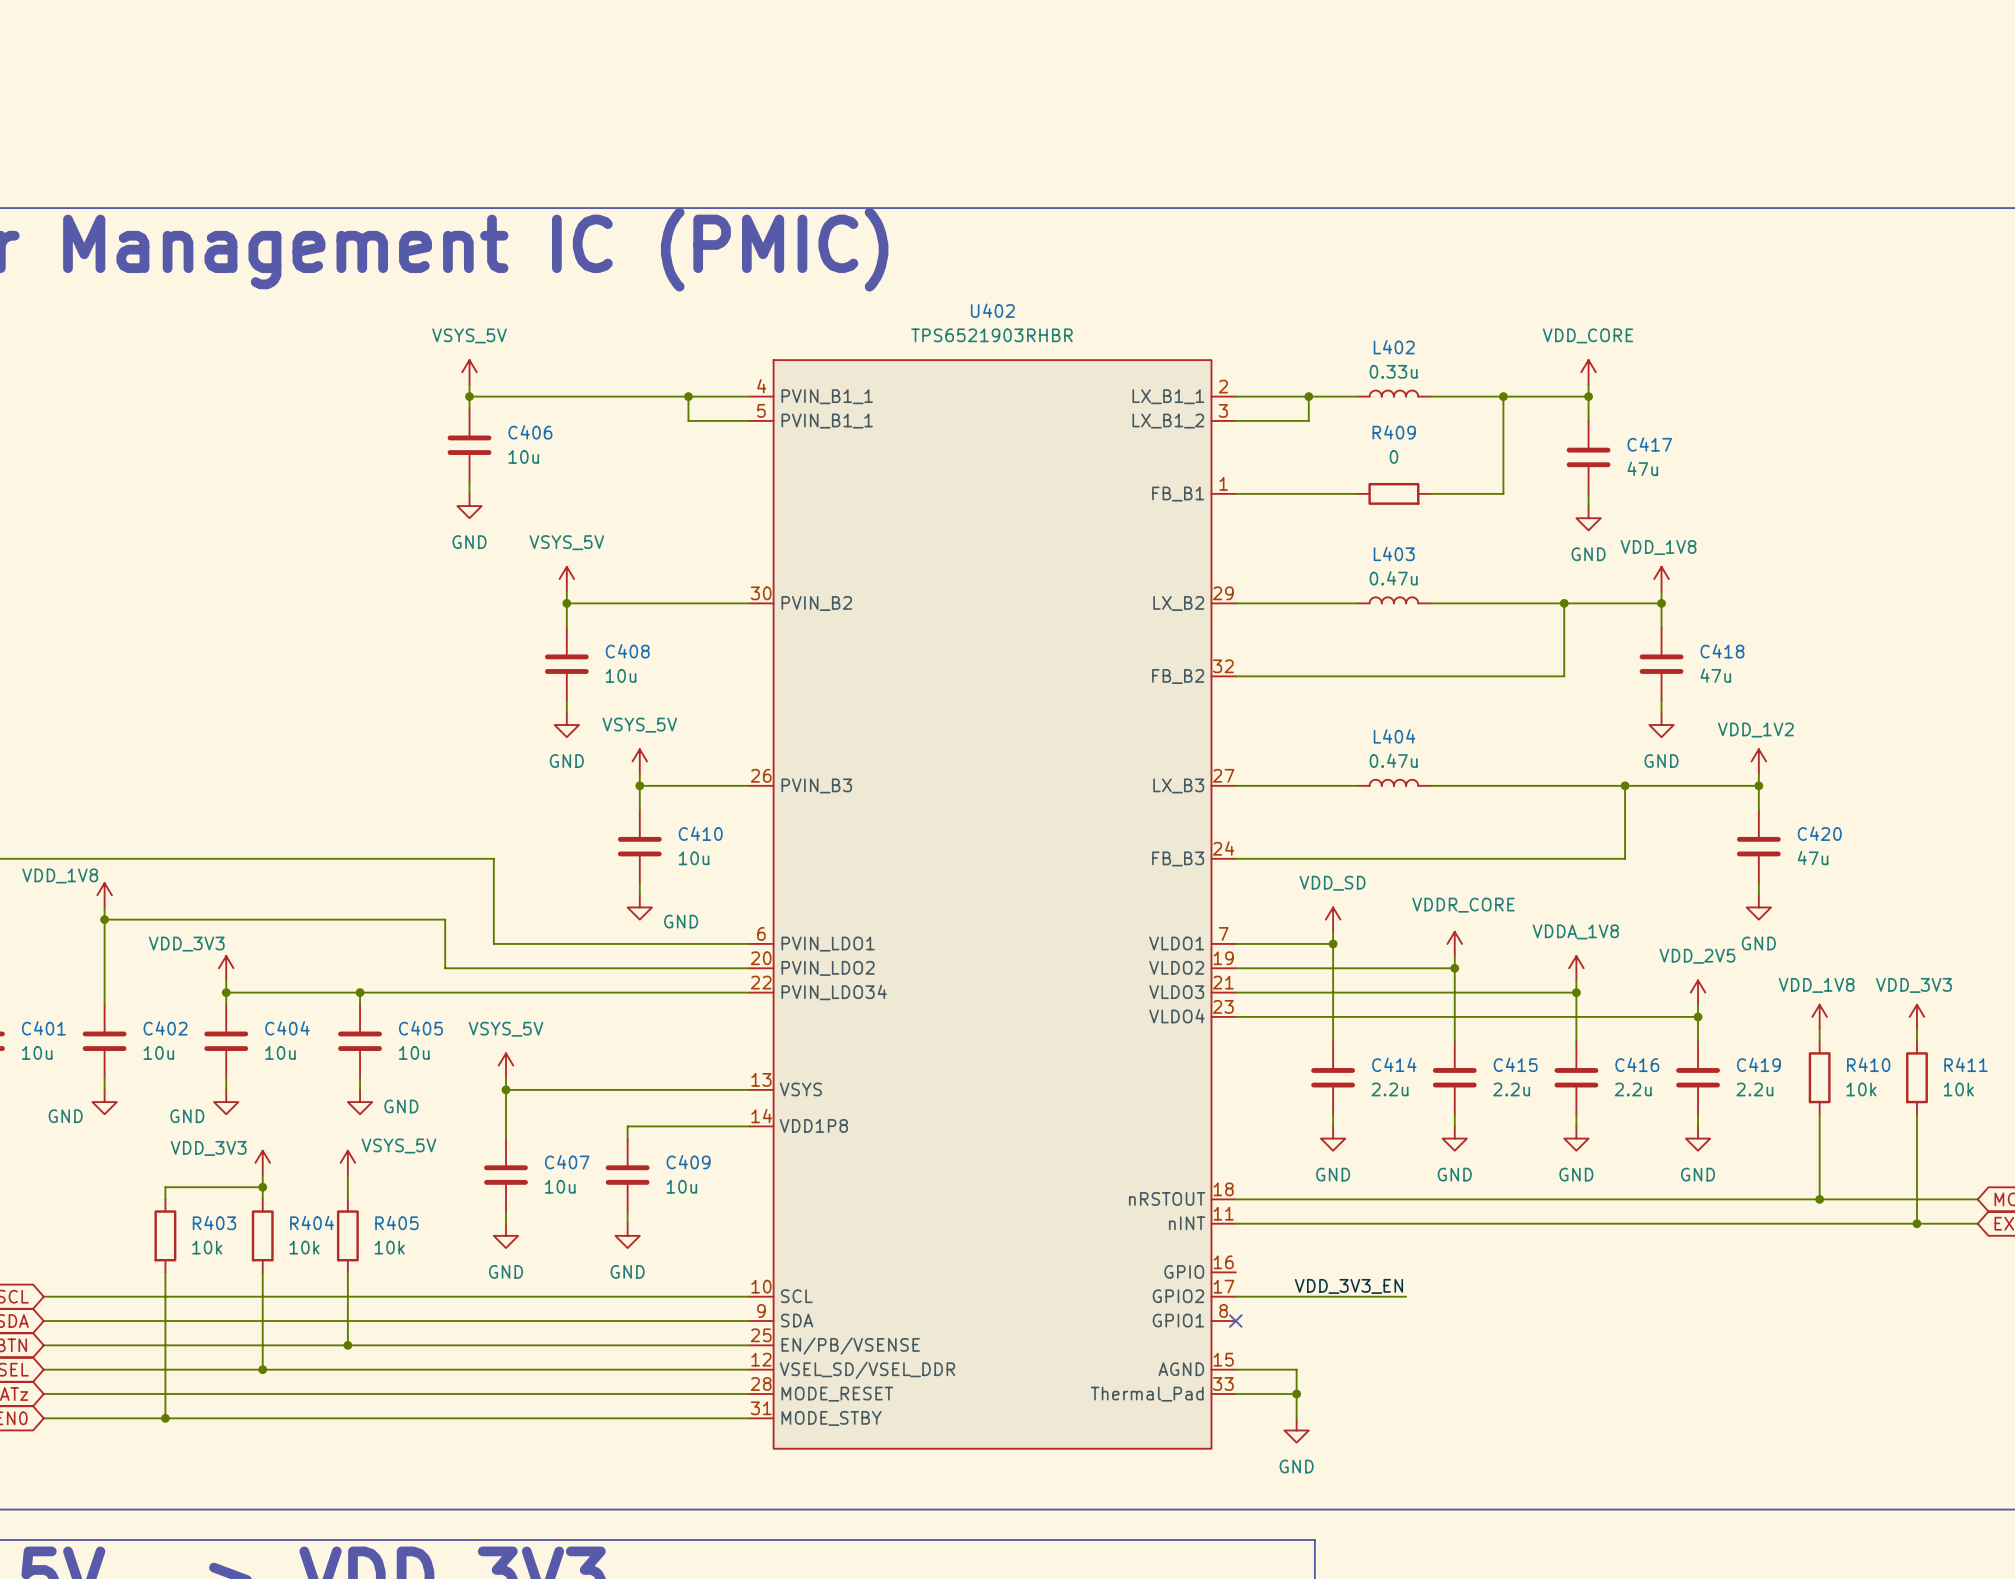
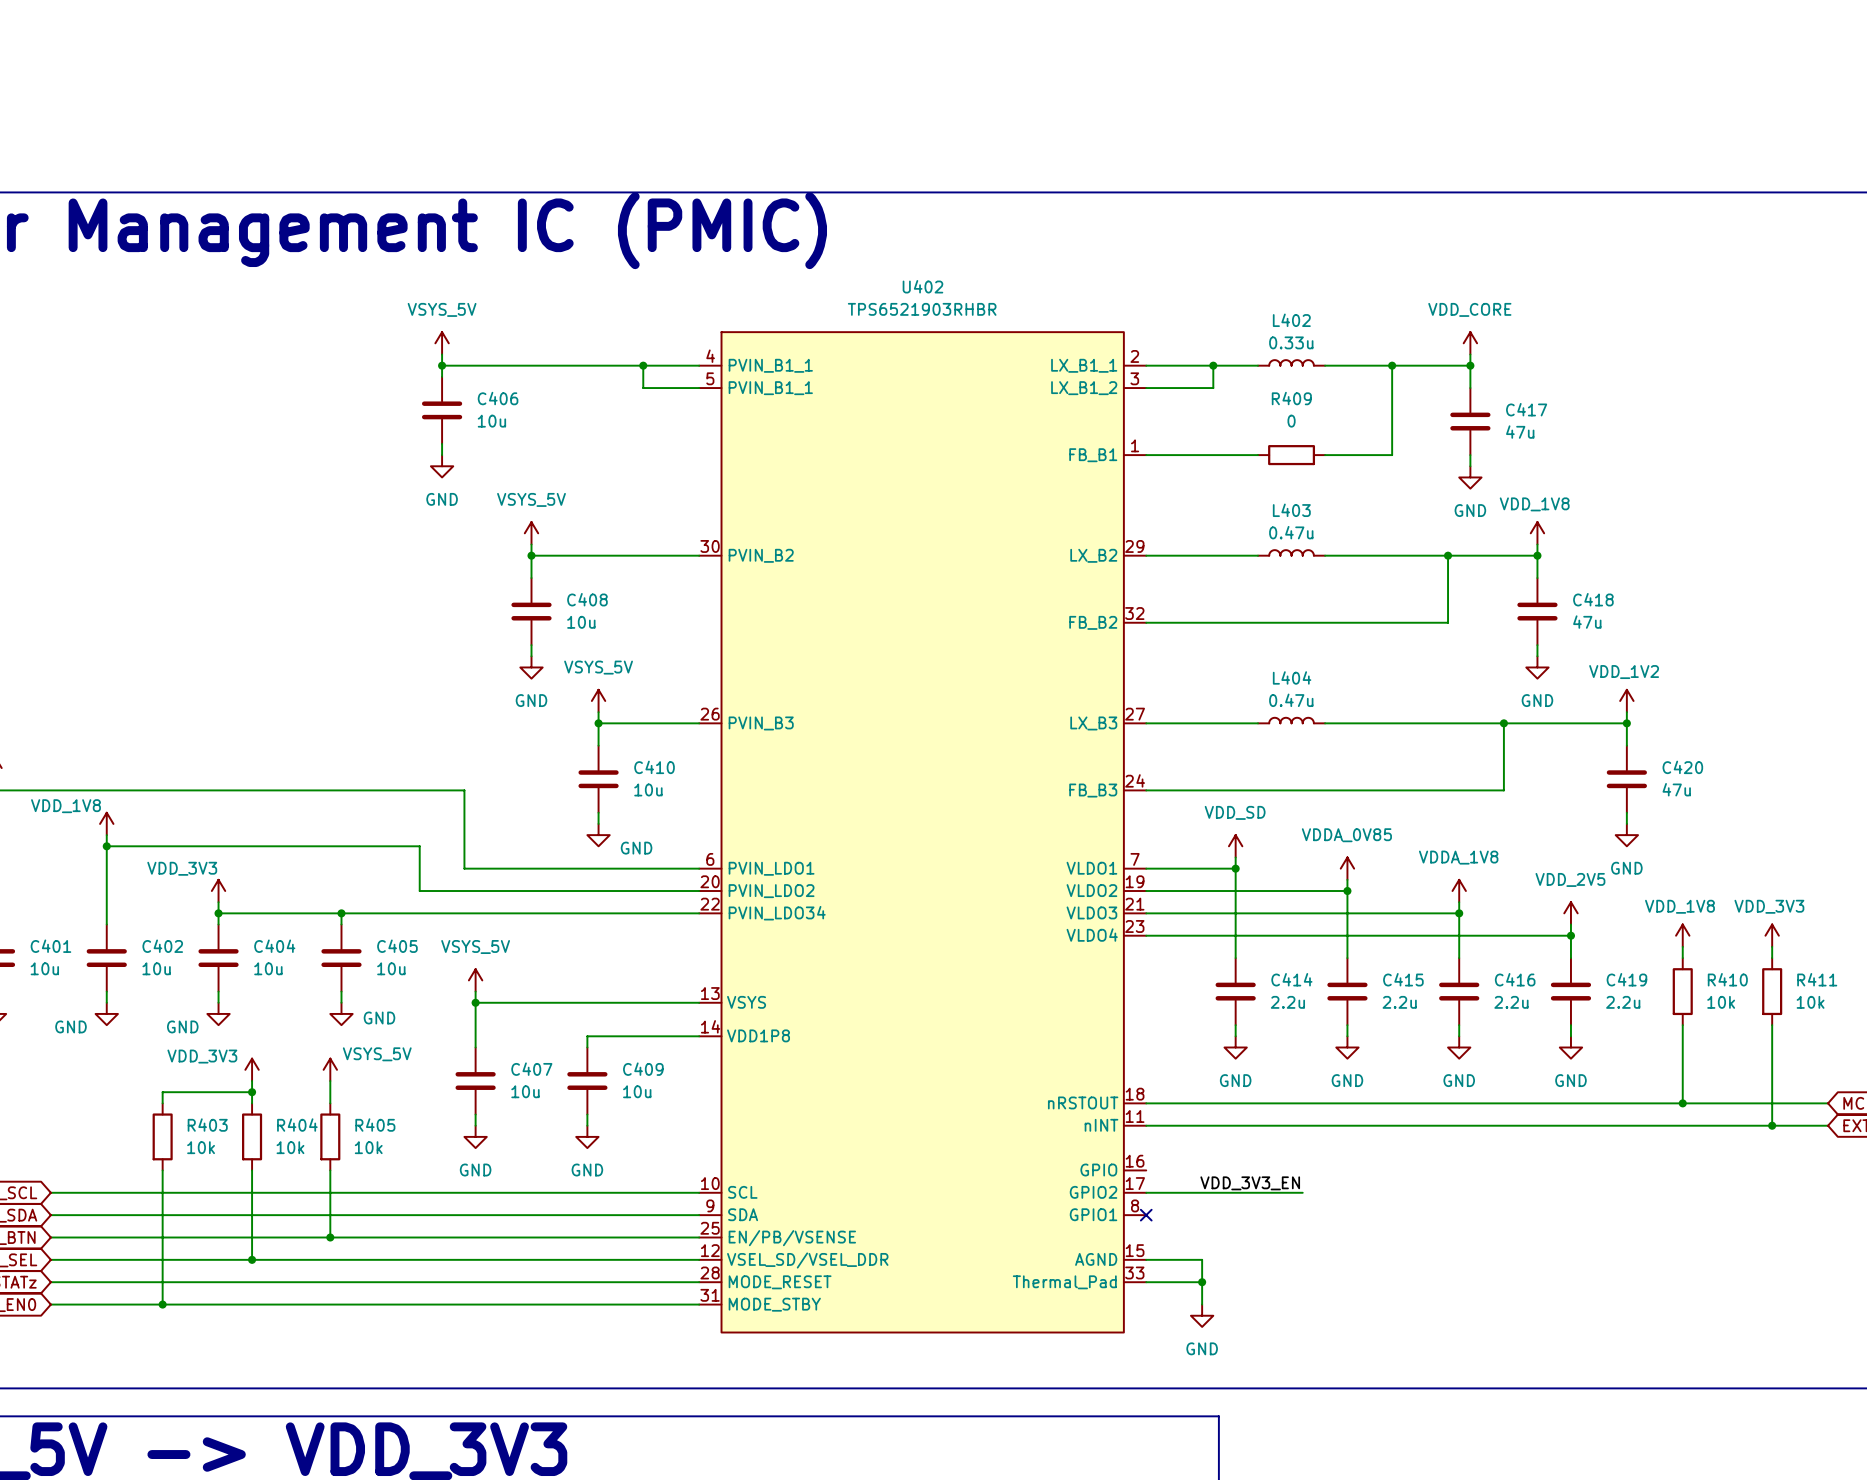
power symbol: VDDR_CORE (1454, 943) -> VDDA_0V85 (1347, 868)

